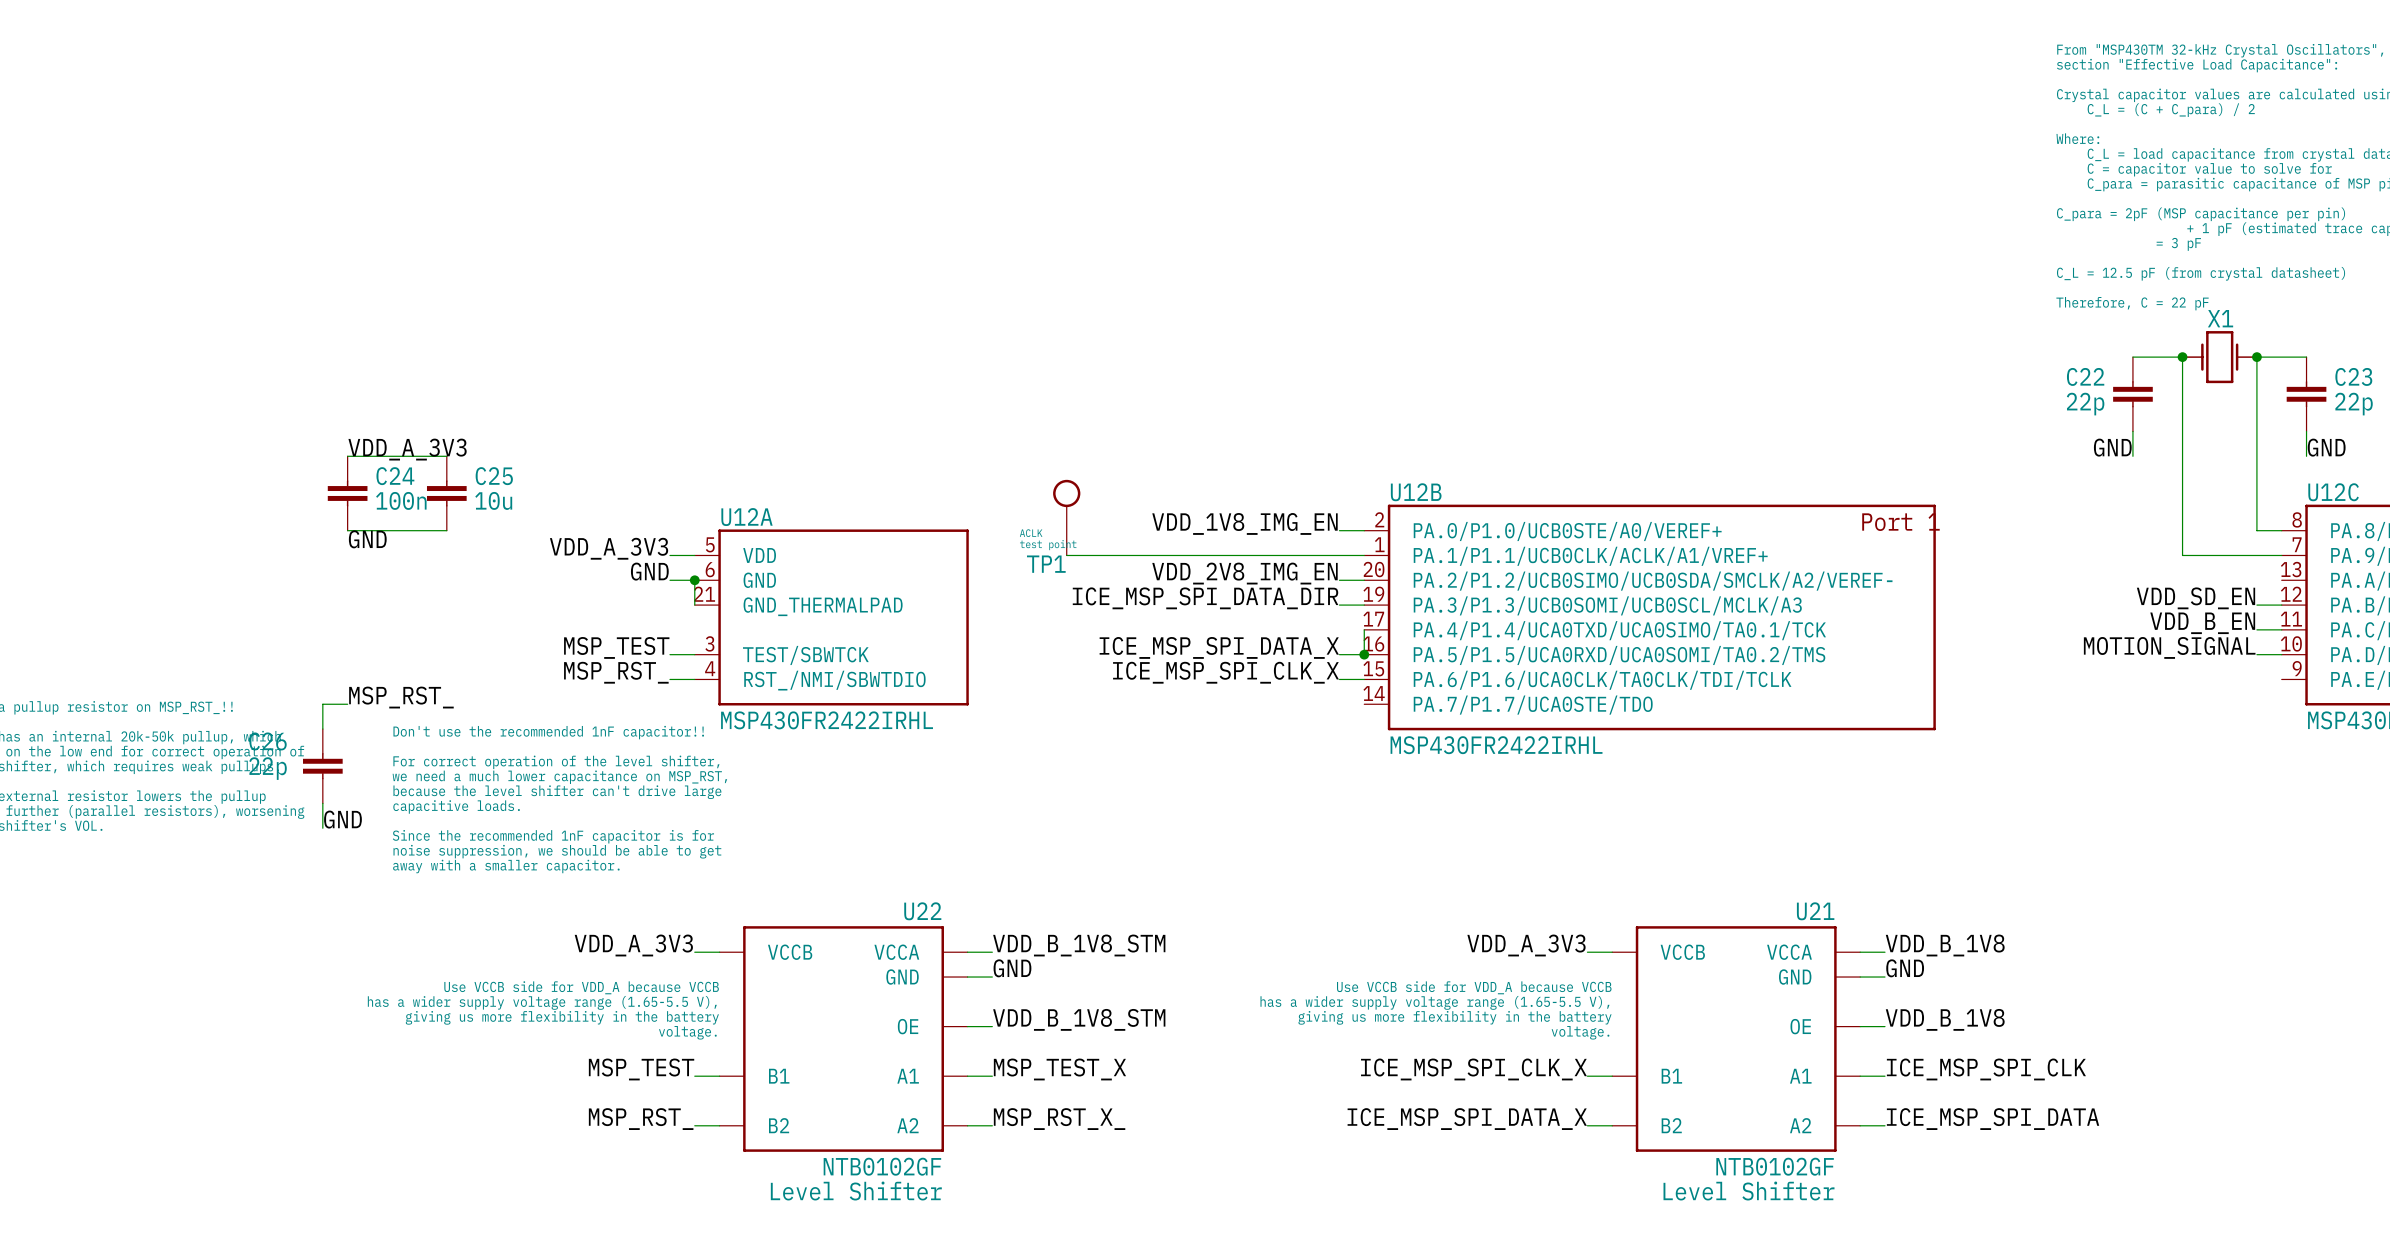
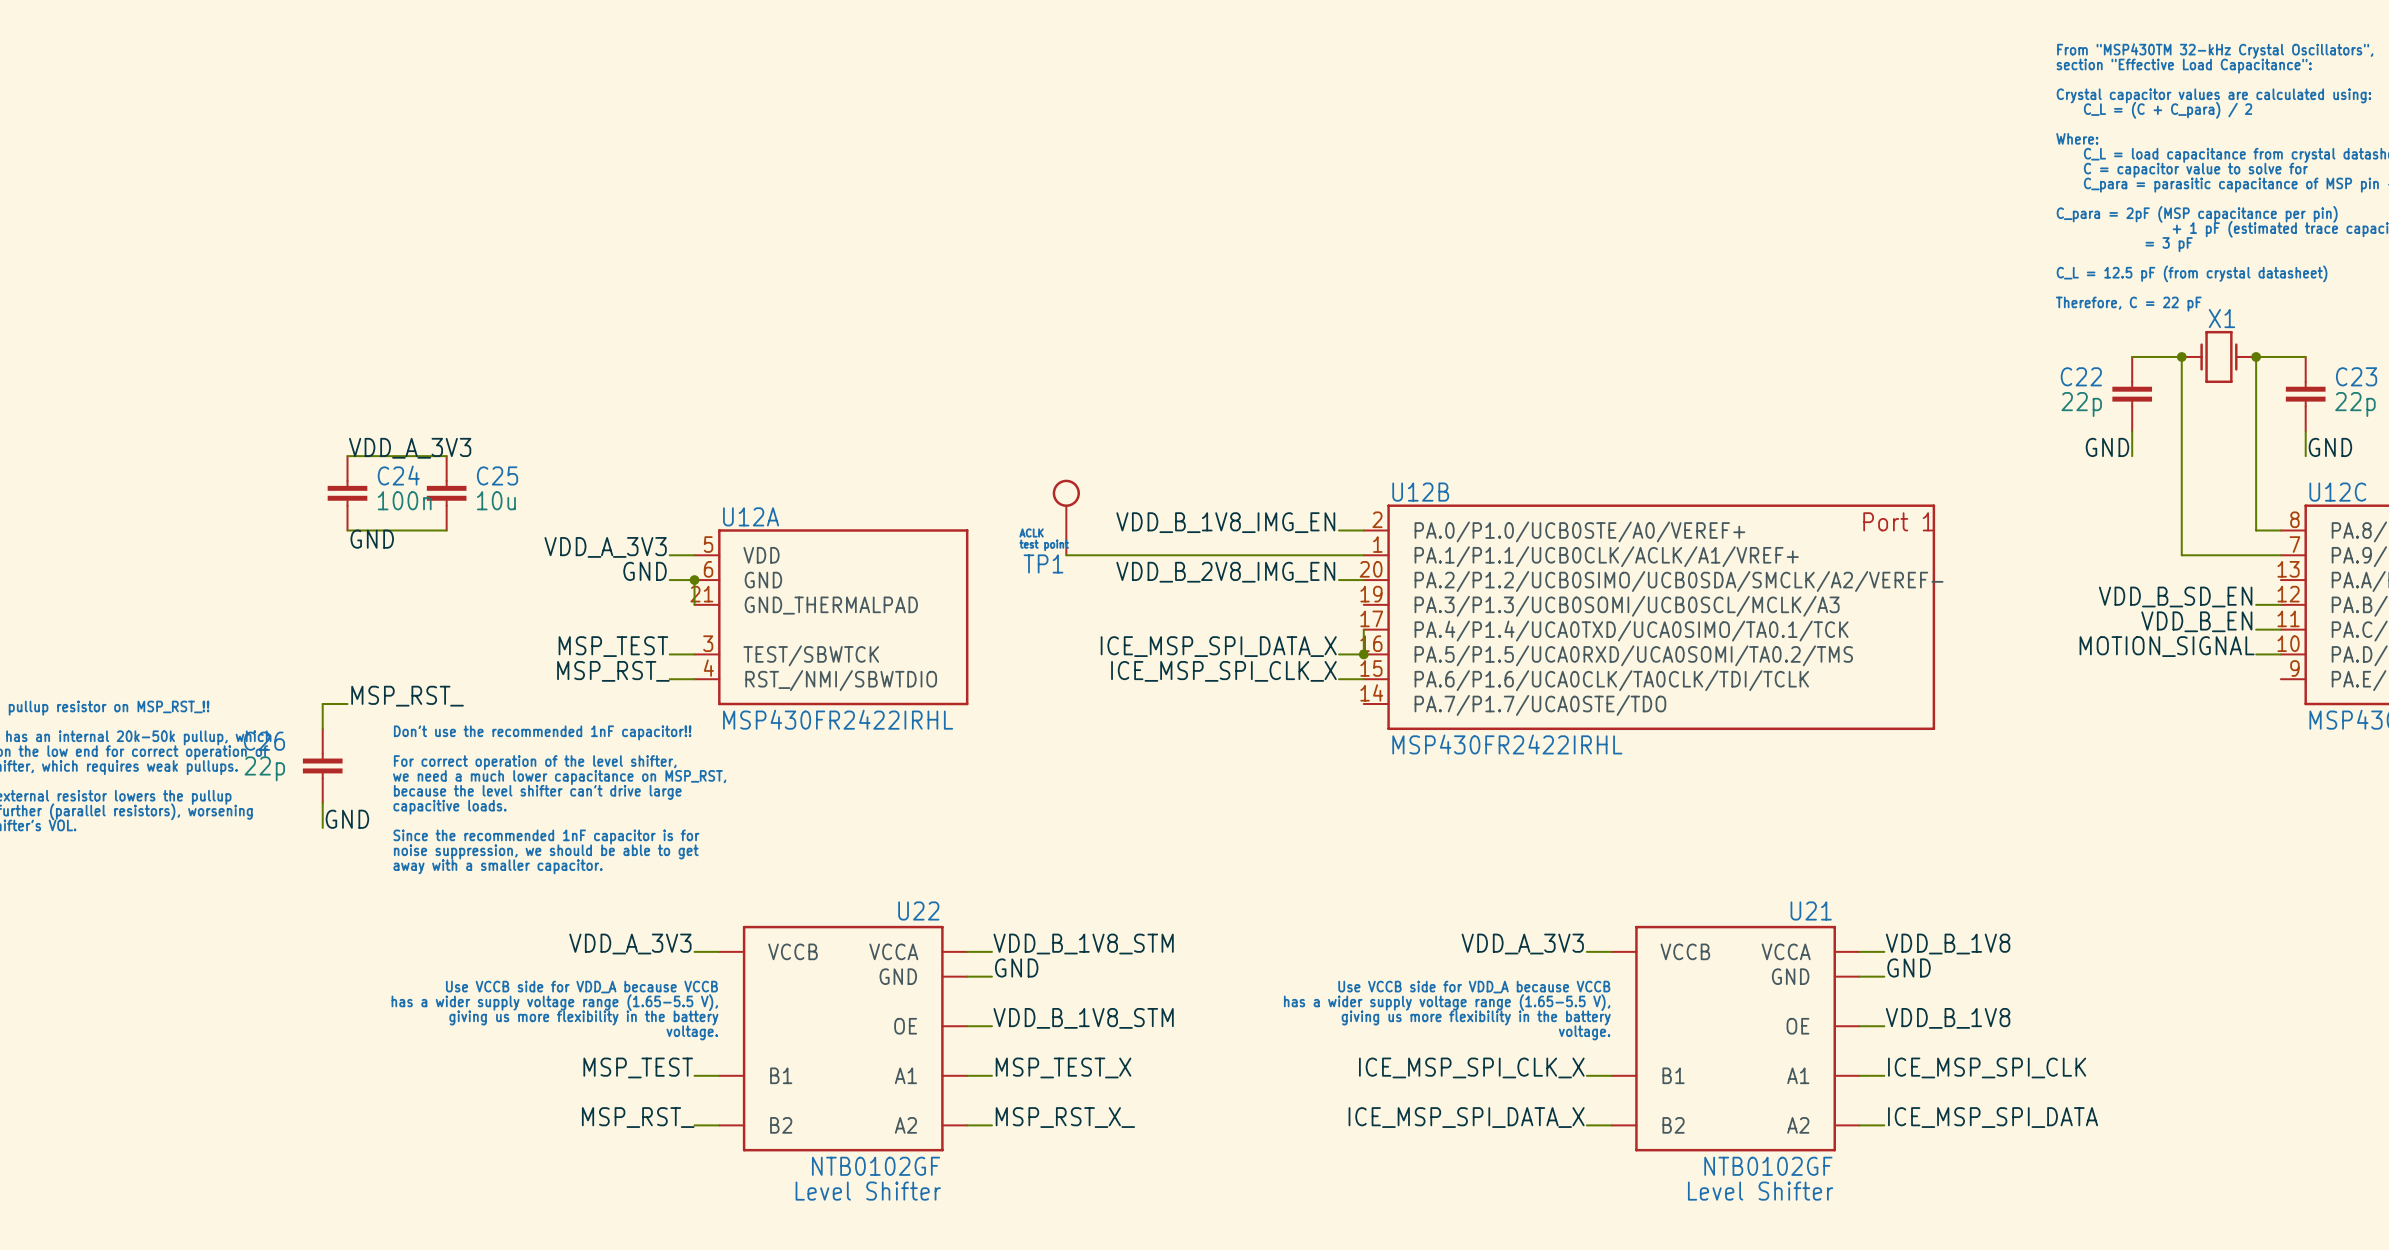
label: VDD_1V8_IMG_EN (1244, 523) -> VDD_B_1V8_IMG_EN (1225, 522)
label: VDD_2V8_IMG_EN (1244, 573) -> VDD_B_2V8_IMG_EN (1225, 572)
label: ICE_MSP_SPI_DATA_DIR (1205, 598) -> none
label: VDD_SD_EN (2196, 598) -> VDD_B_SD_EN (2175, 597)
wire: (1339, 605) (1364, 605) -> none

